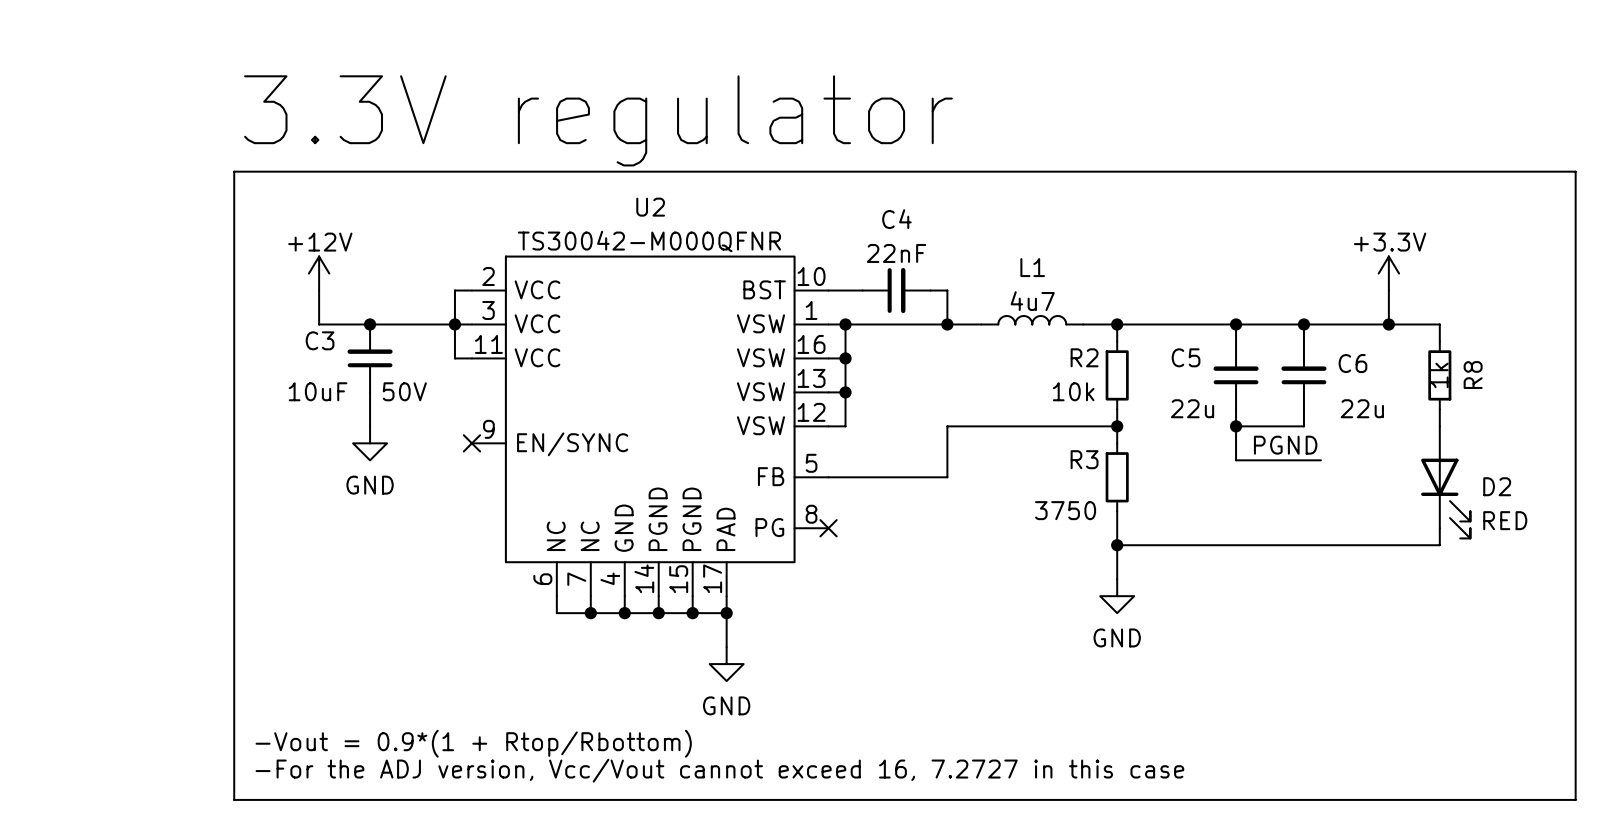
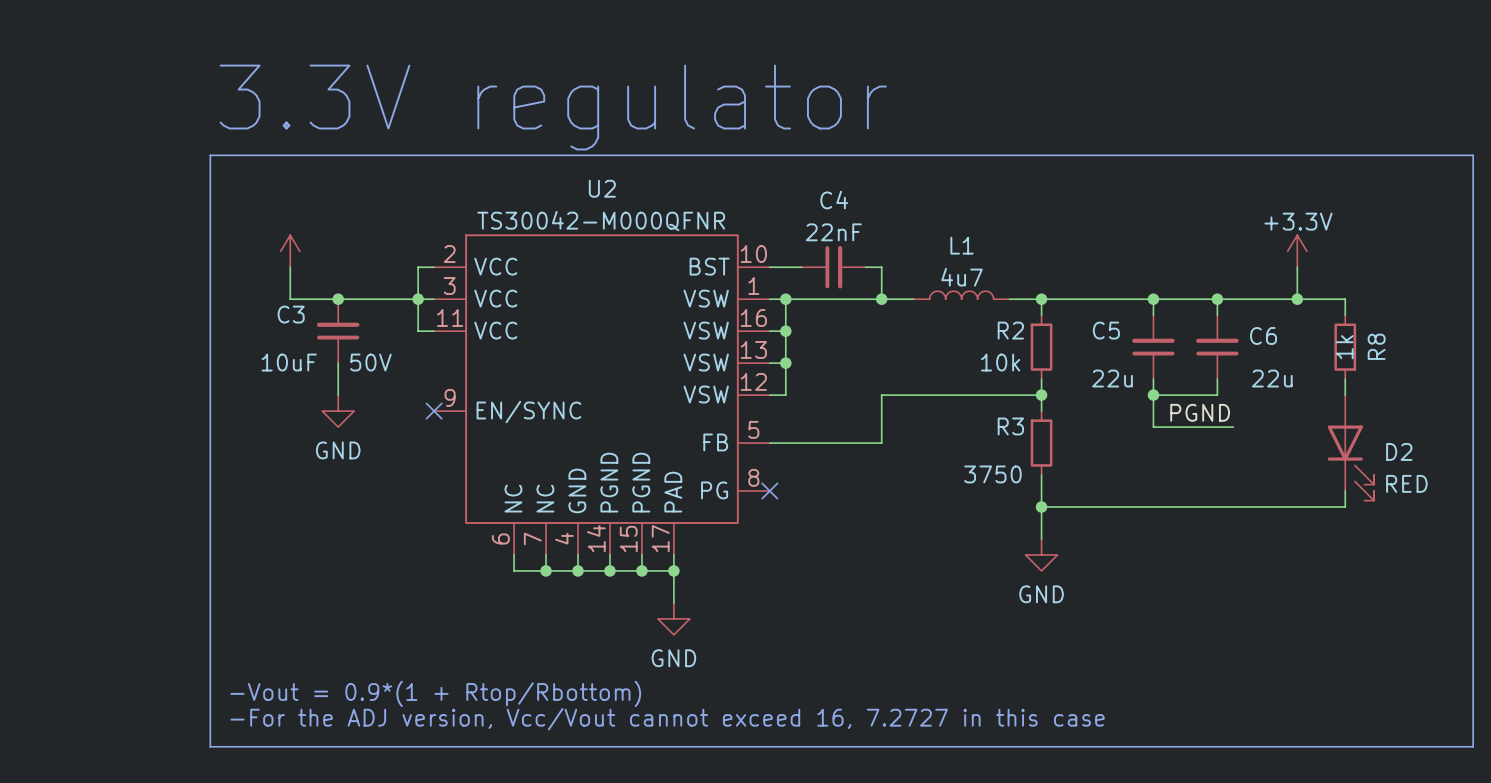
power symbol text: +12V (320, 242) -> none

